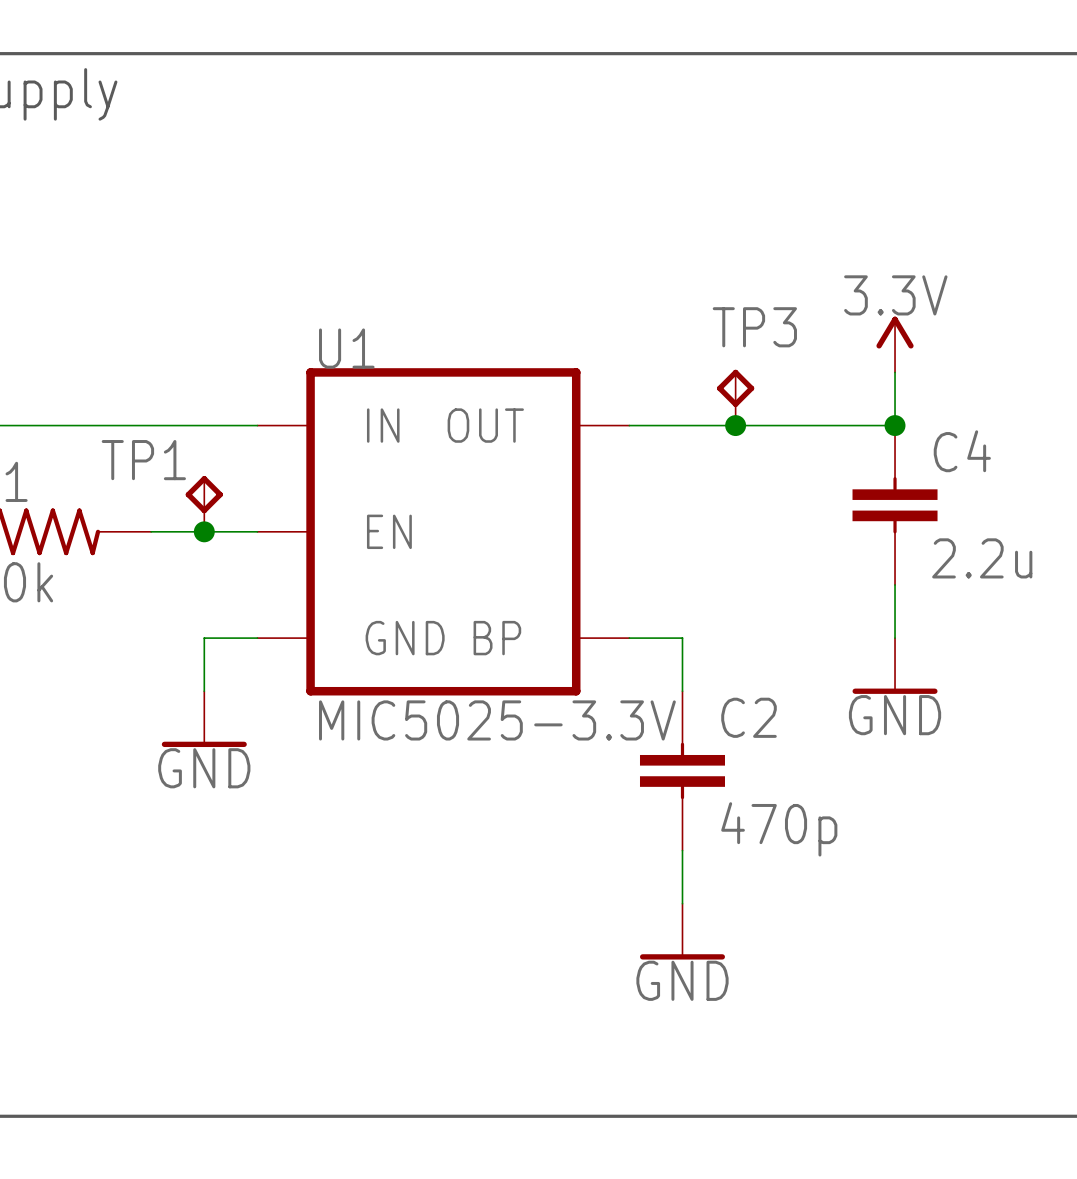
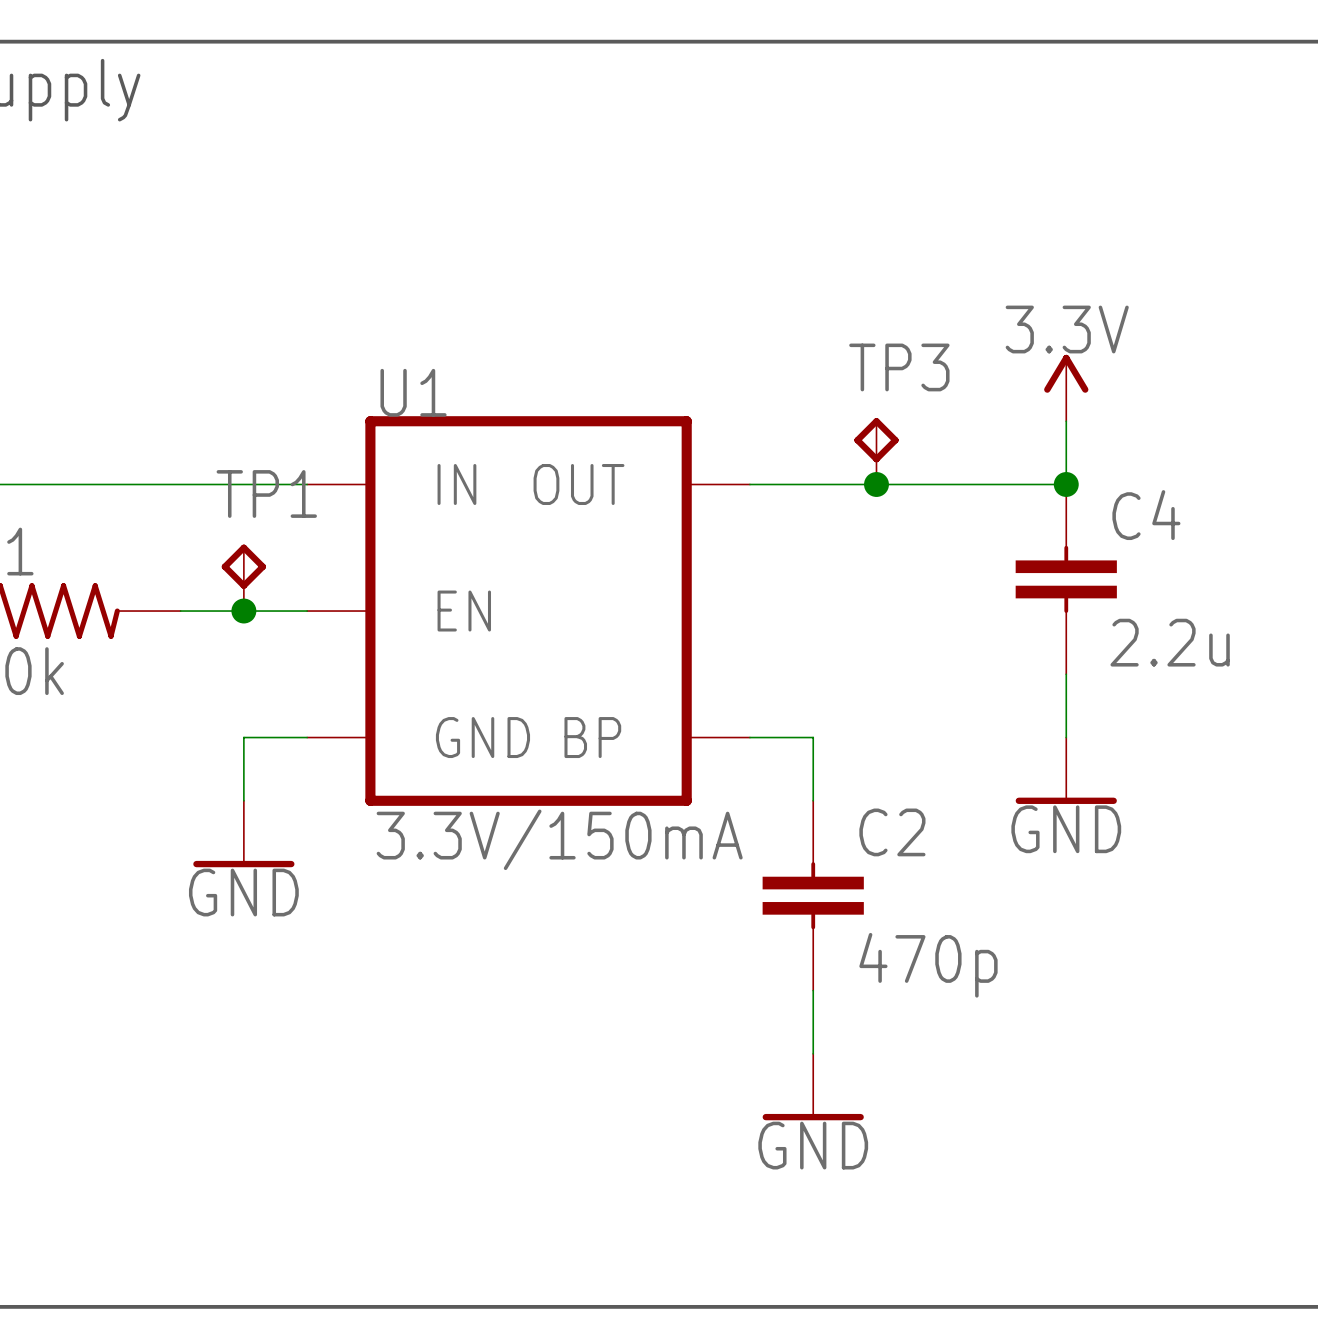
TP1 name position: TP1 (143, 460) -> TP1 (266, 493)
U1 value: MIC5025-3.3V (497, 720) -> 3.3V/150mA (559, 839)

